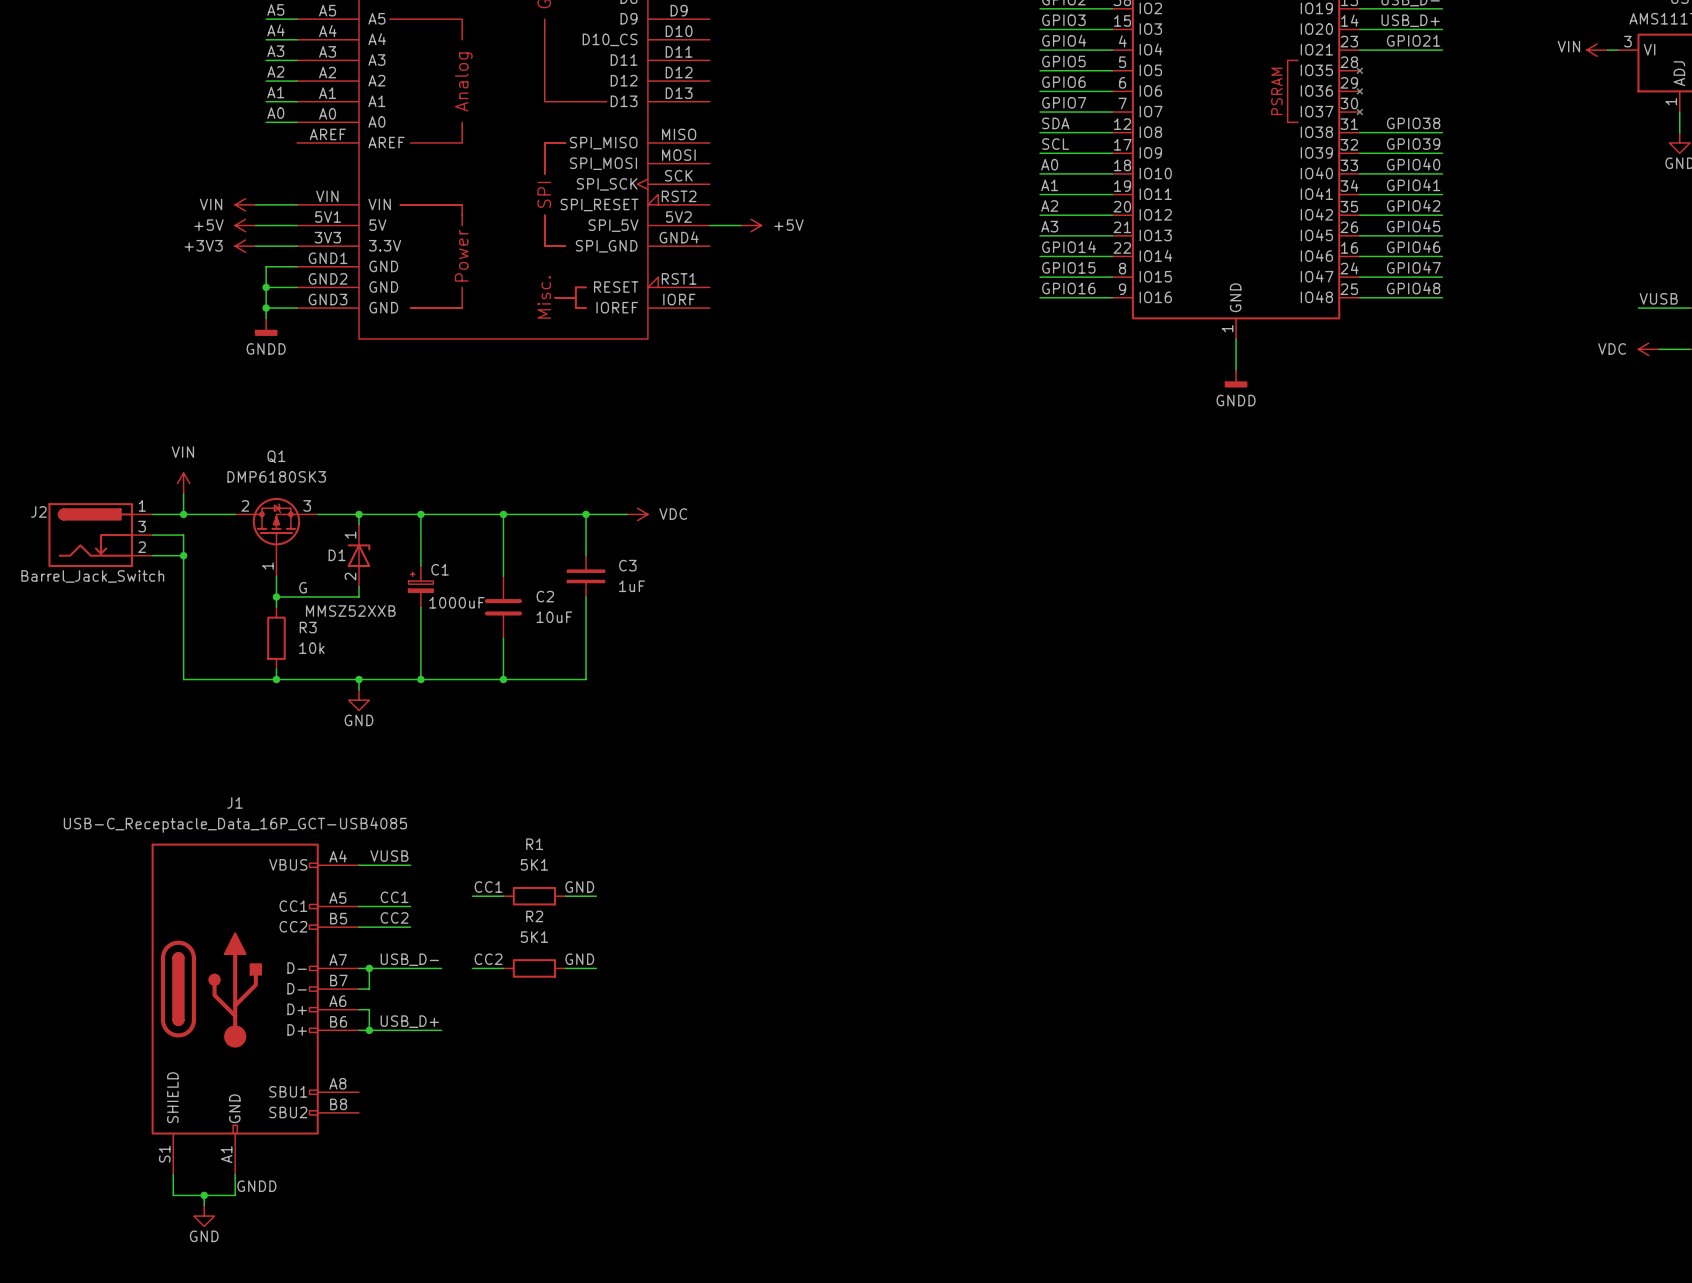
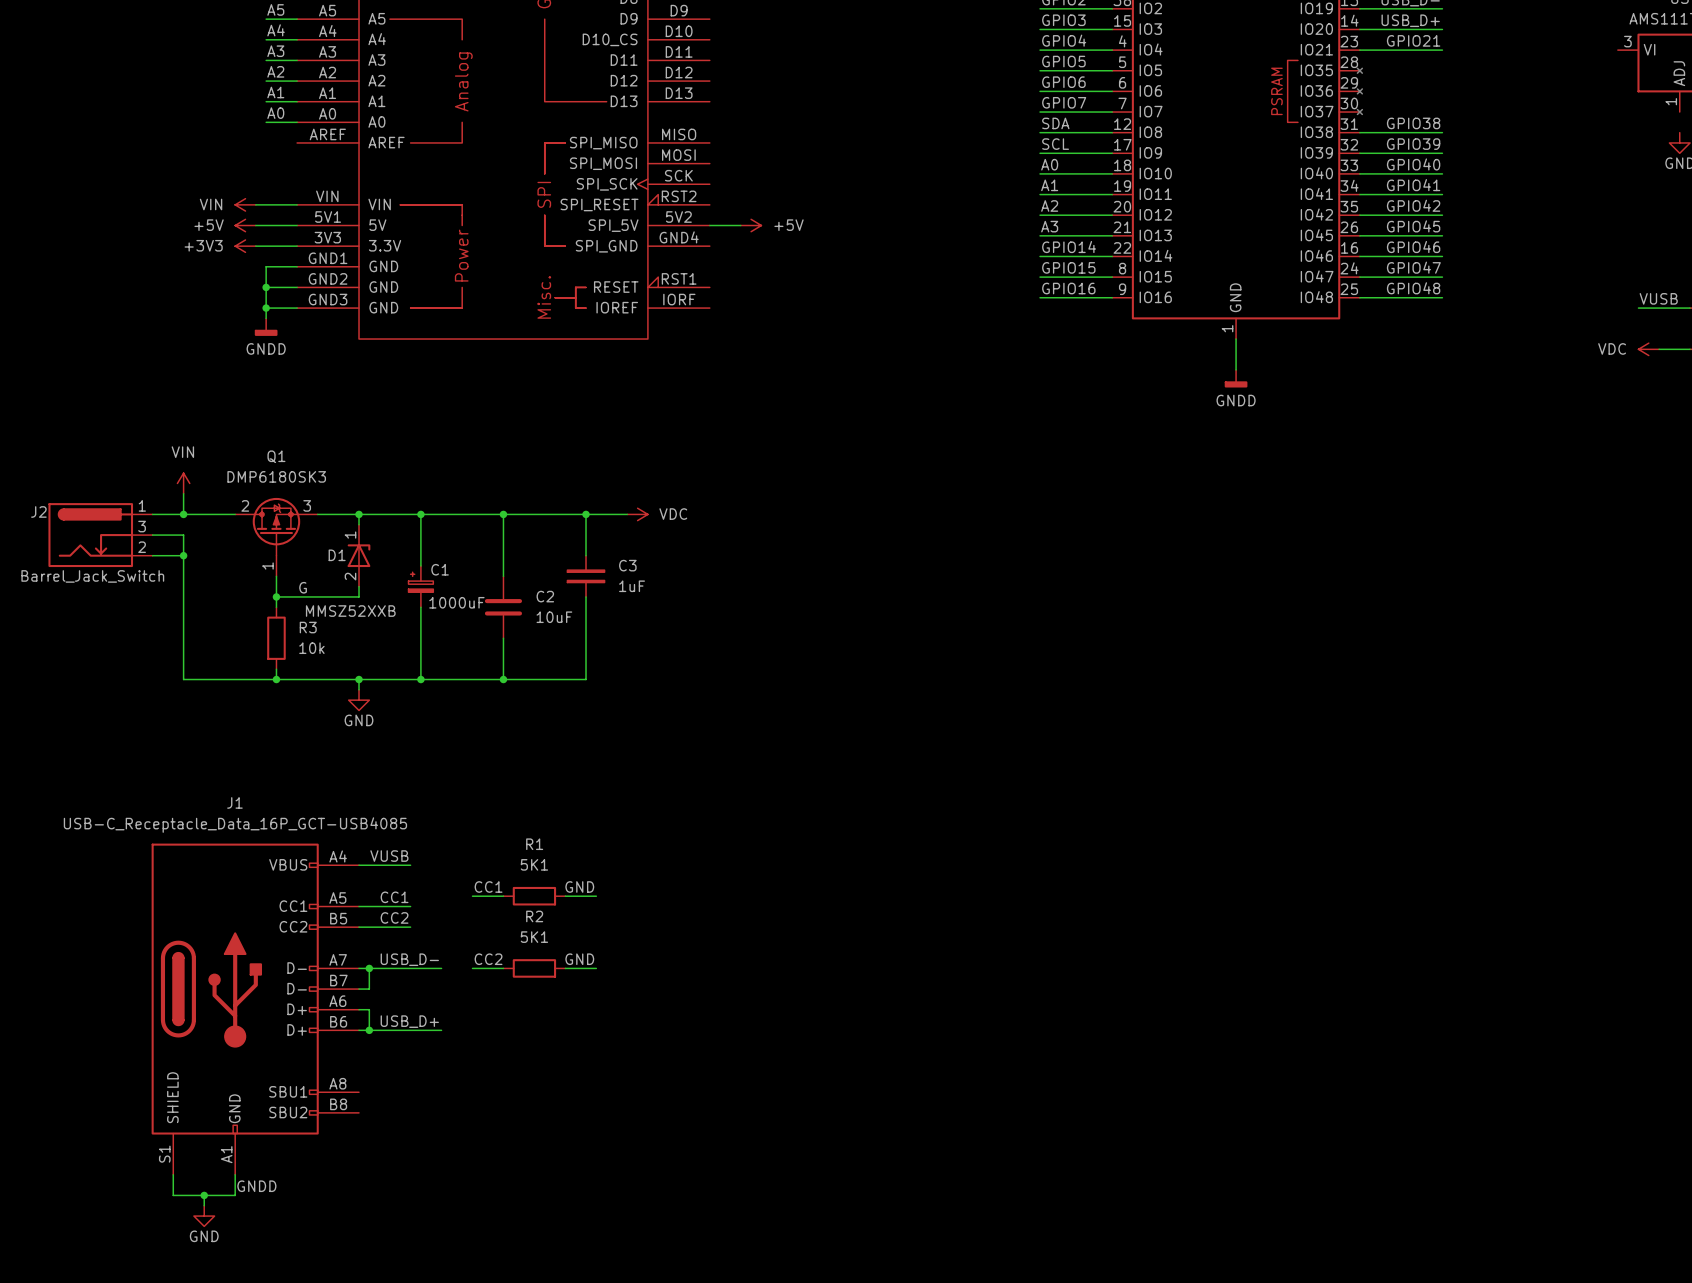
power symbol: VIN (1597, 50) -> none
wire: (1607, 50) (1617, 50) -> none
wire: (1679, 112) (1679, 132) -> none

